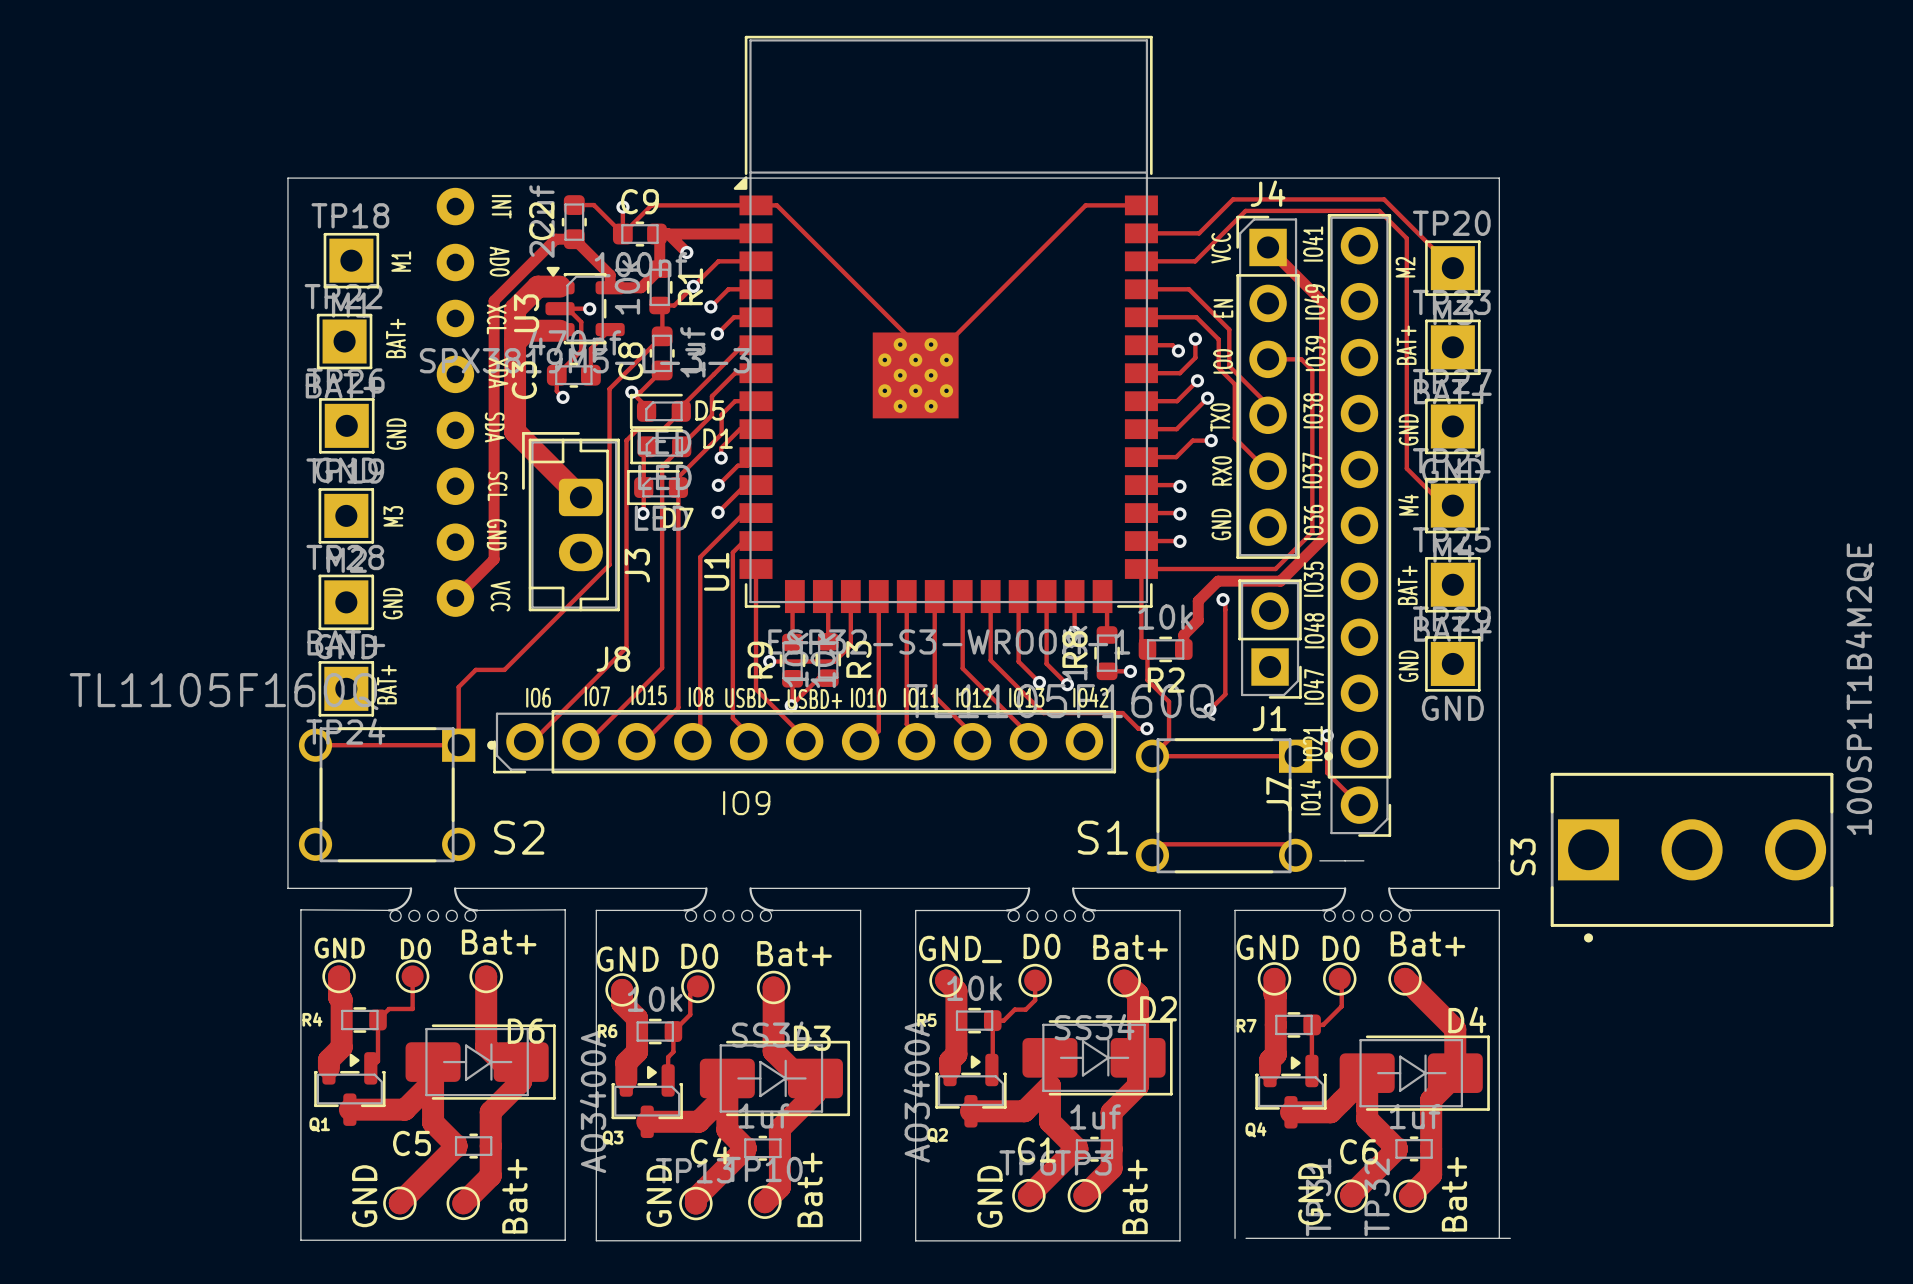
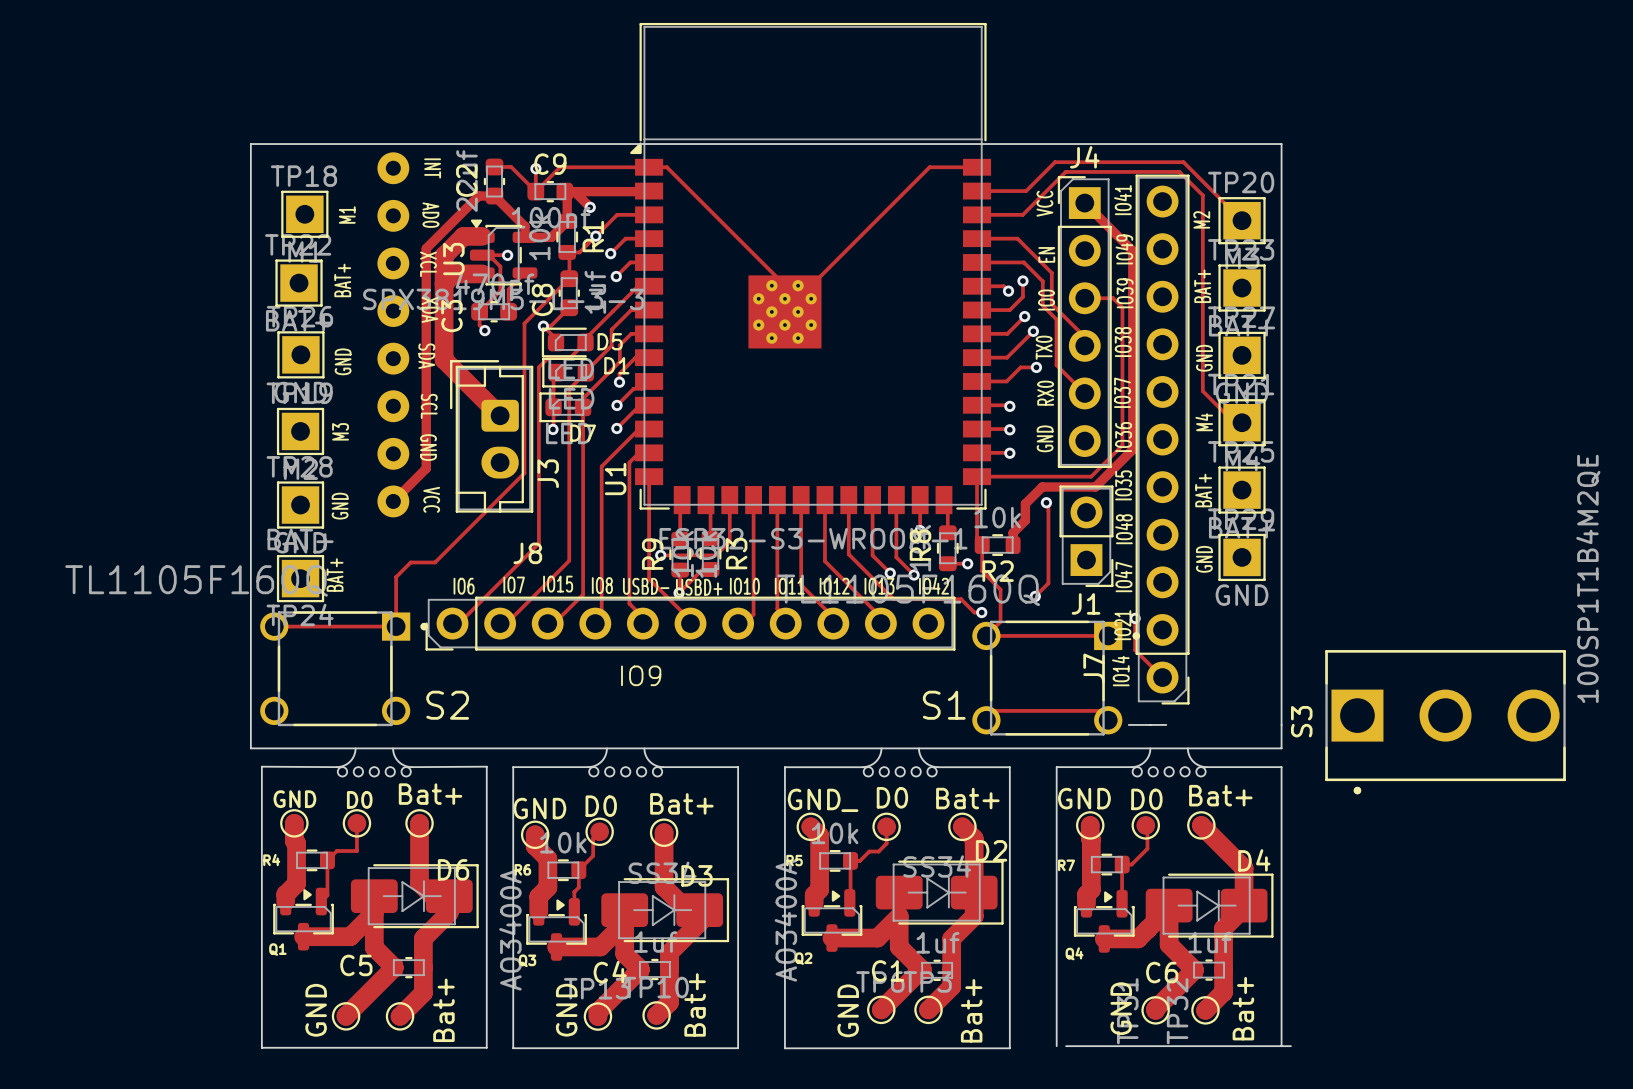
board edge: none -> (355, 748) (393, 748)
board edge: none -> (606, 748) (644, 748)
board edge: none -> (881, 748) (918, 748)
board edge: none -> (1150, 748) (1187, 748)

